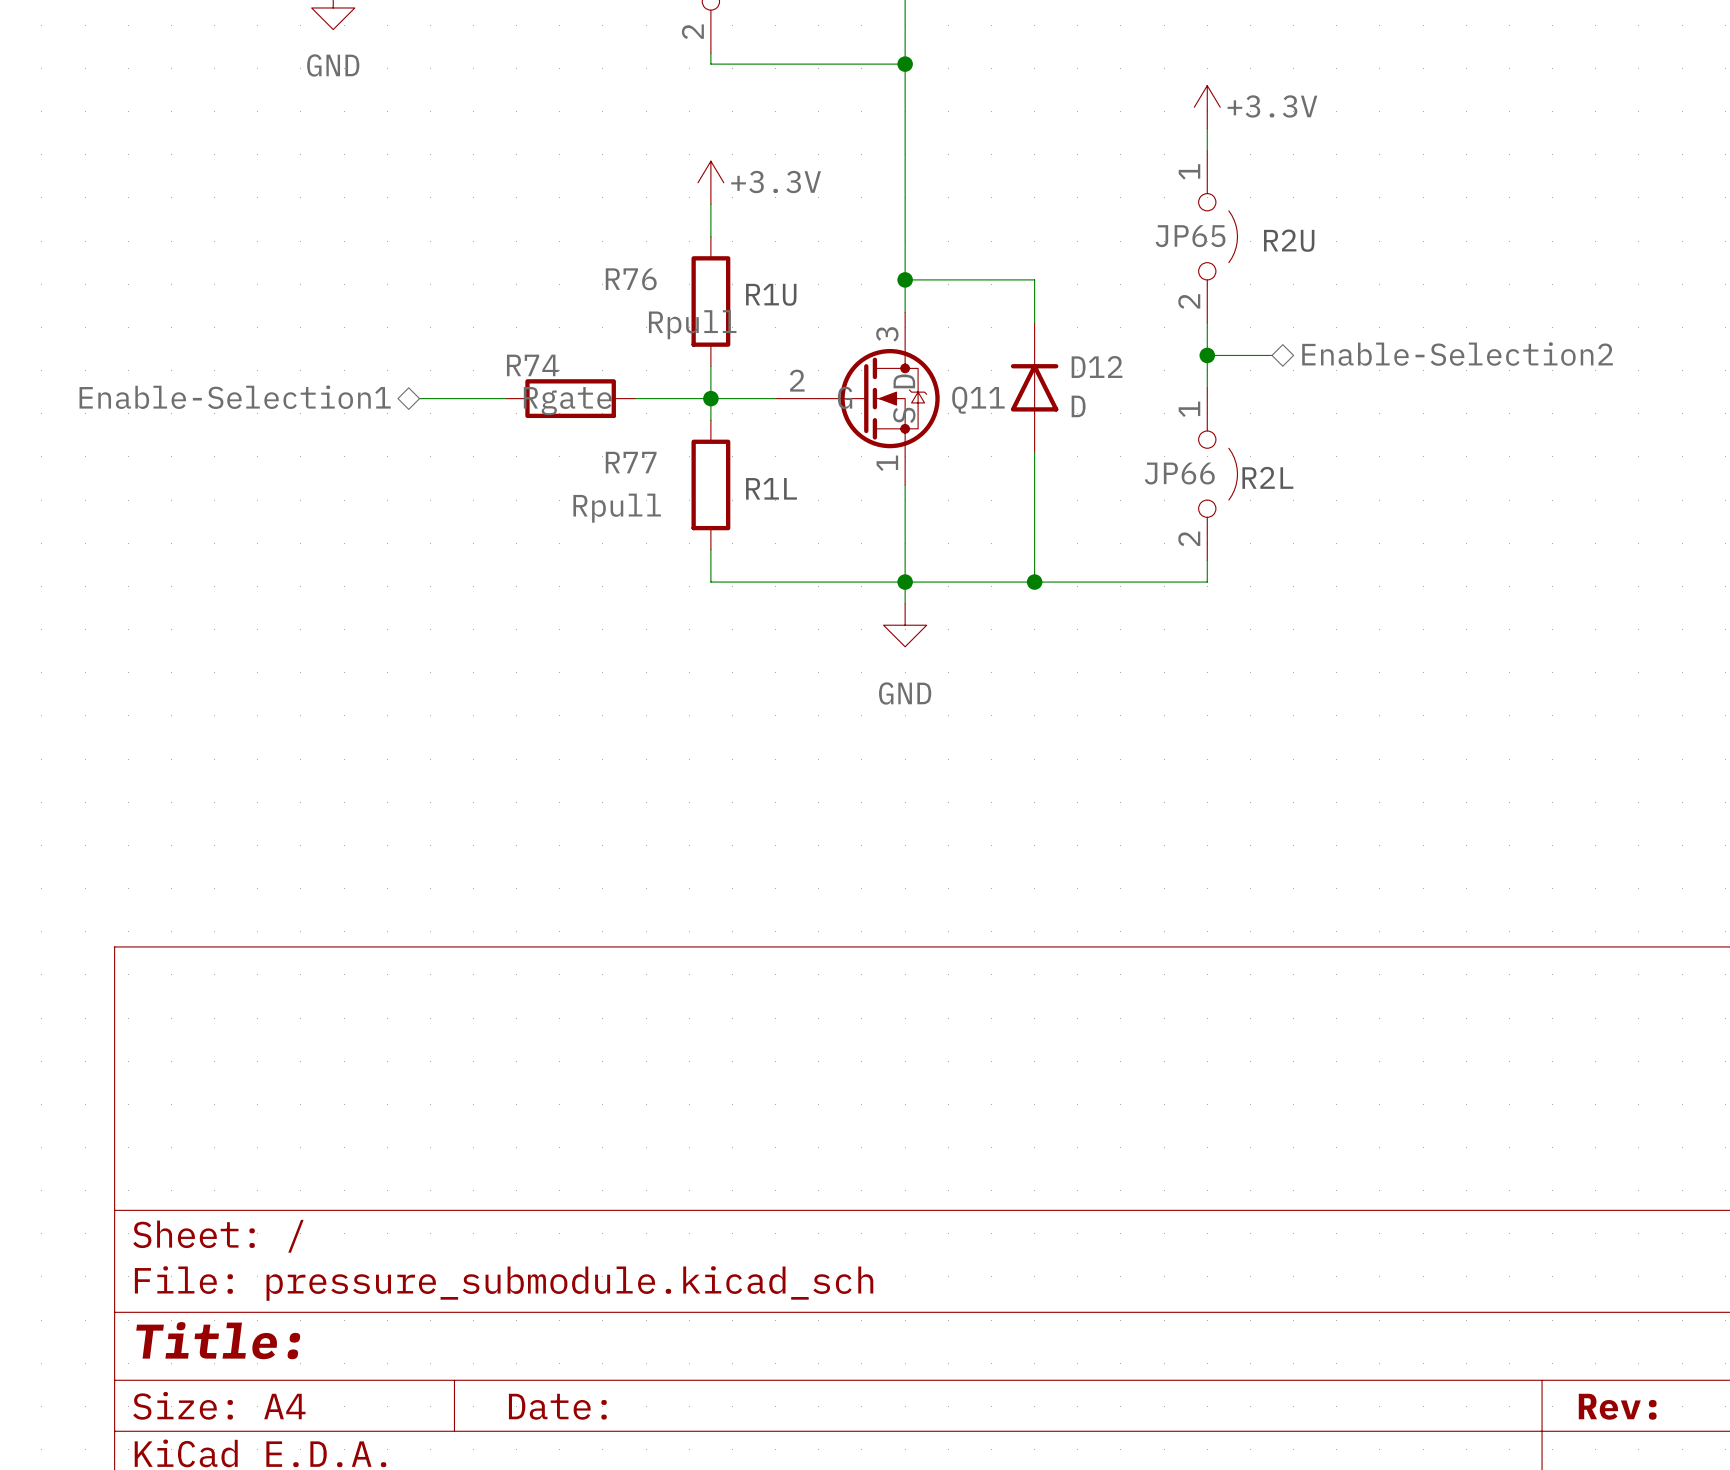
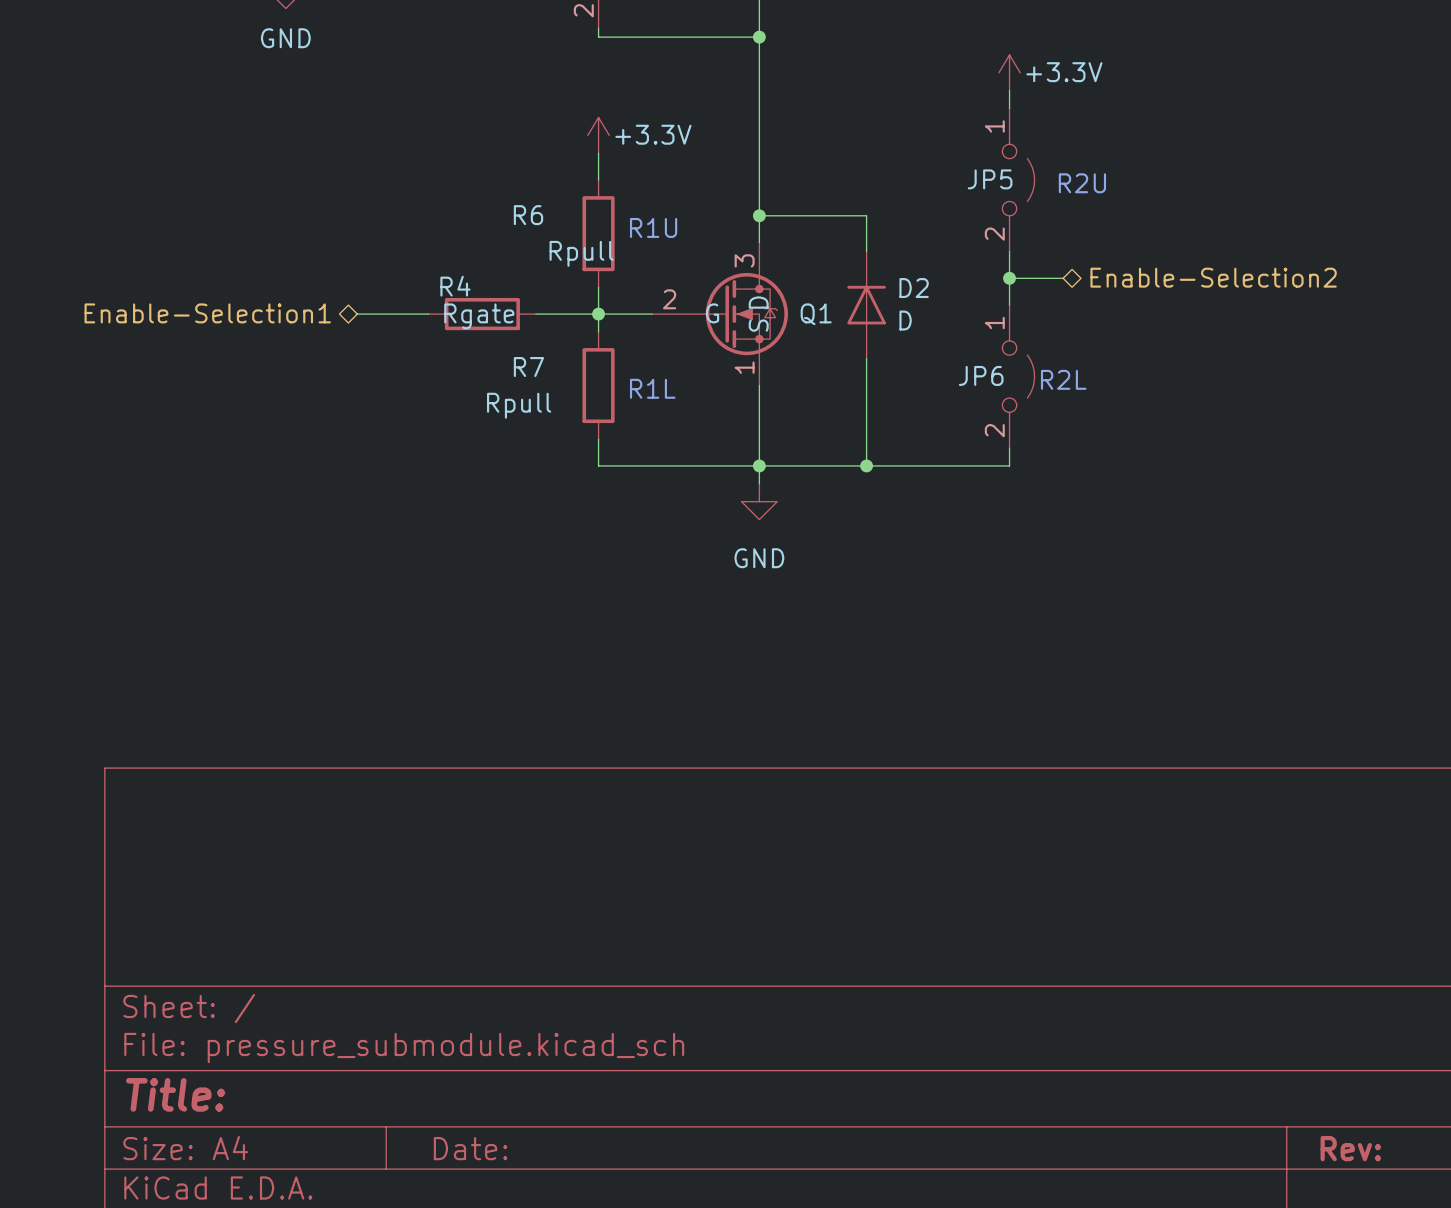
JP65 name: JP65 (1190, 236) -> JP5 (990, 179)
R76 name: R76 (631, 279) -> R6 (528, 215)
R74 name: R74 (532, 365) -> R4 (455, 286)
D12: D (1034, 387) -> none
D2: none -> D (866, 305)
Q11 name: Q11 (978, 400) -> Q1 (816, 314)
R77 name: R77 (631, 462) -> R7 (528, 367)
JP66 name: JP66 (1179, 473) -> JP6 (981, 375)

